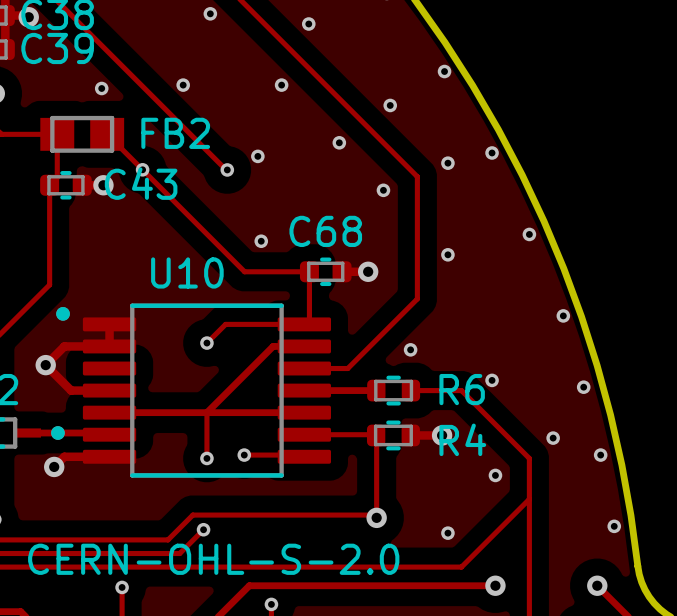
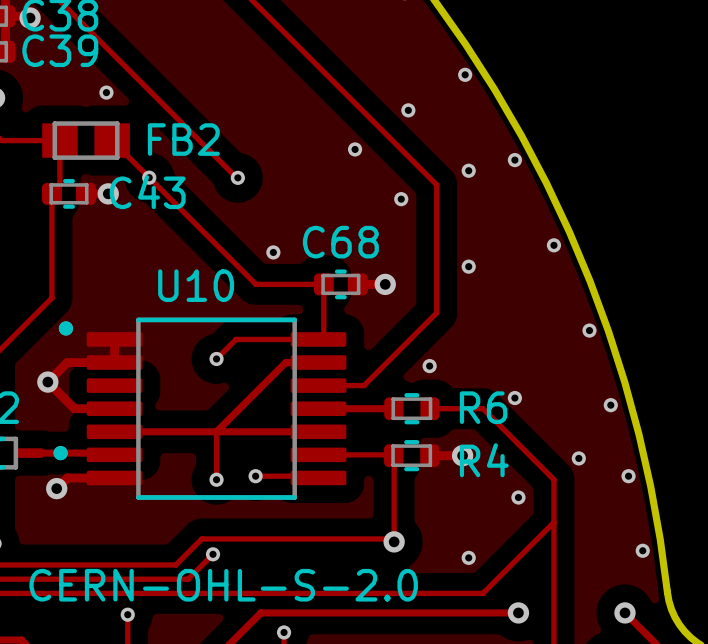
via: (210, 13) -> none
via: (308, 24) -> none
via: (183, 85) -> none
via: (281, 85) -> none
via: (257, 156) -> none

